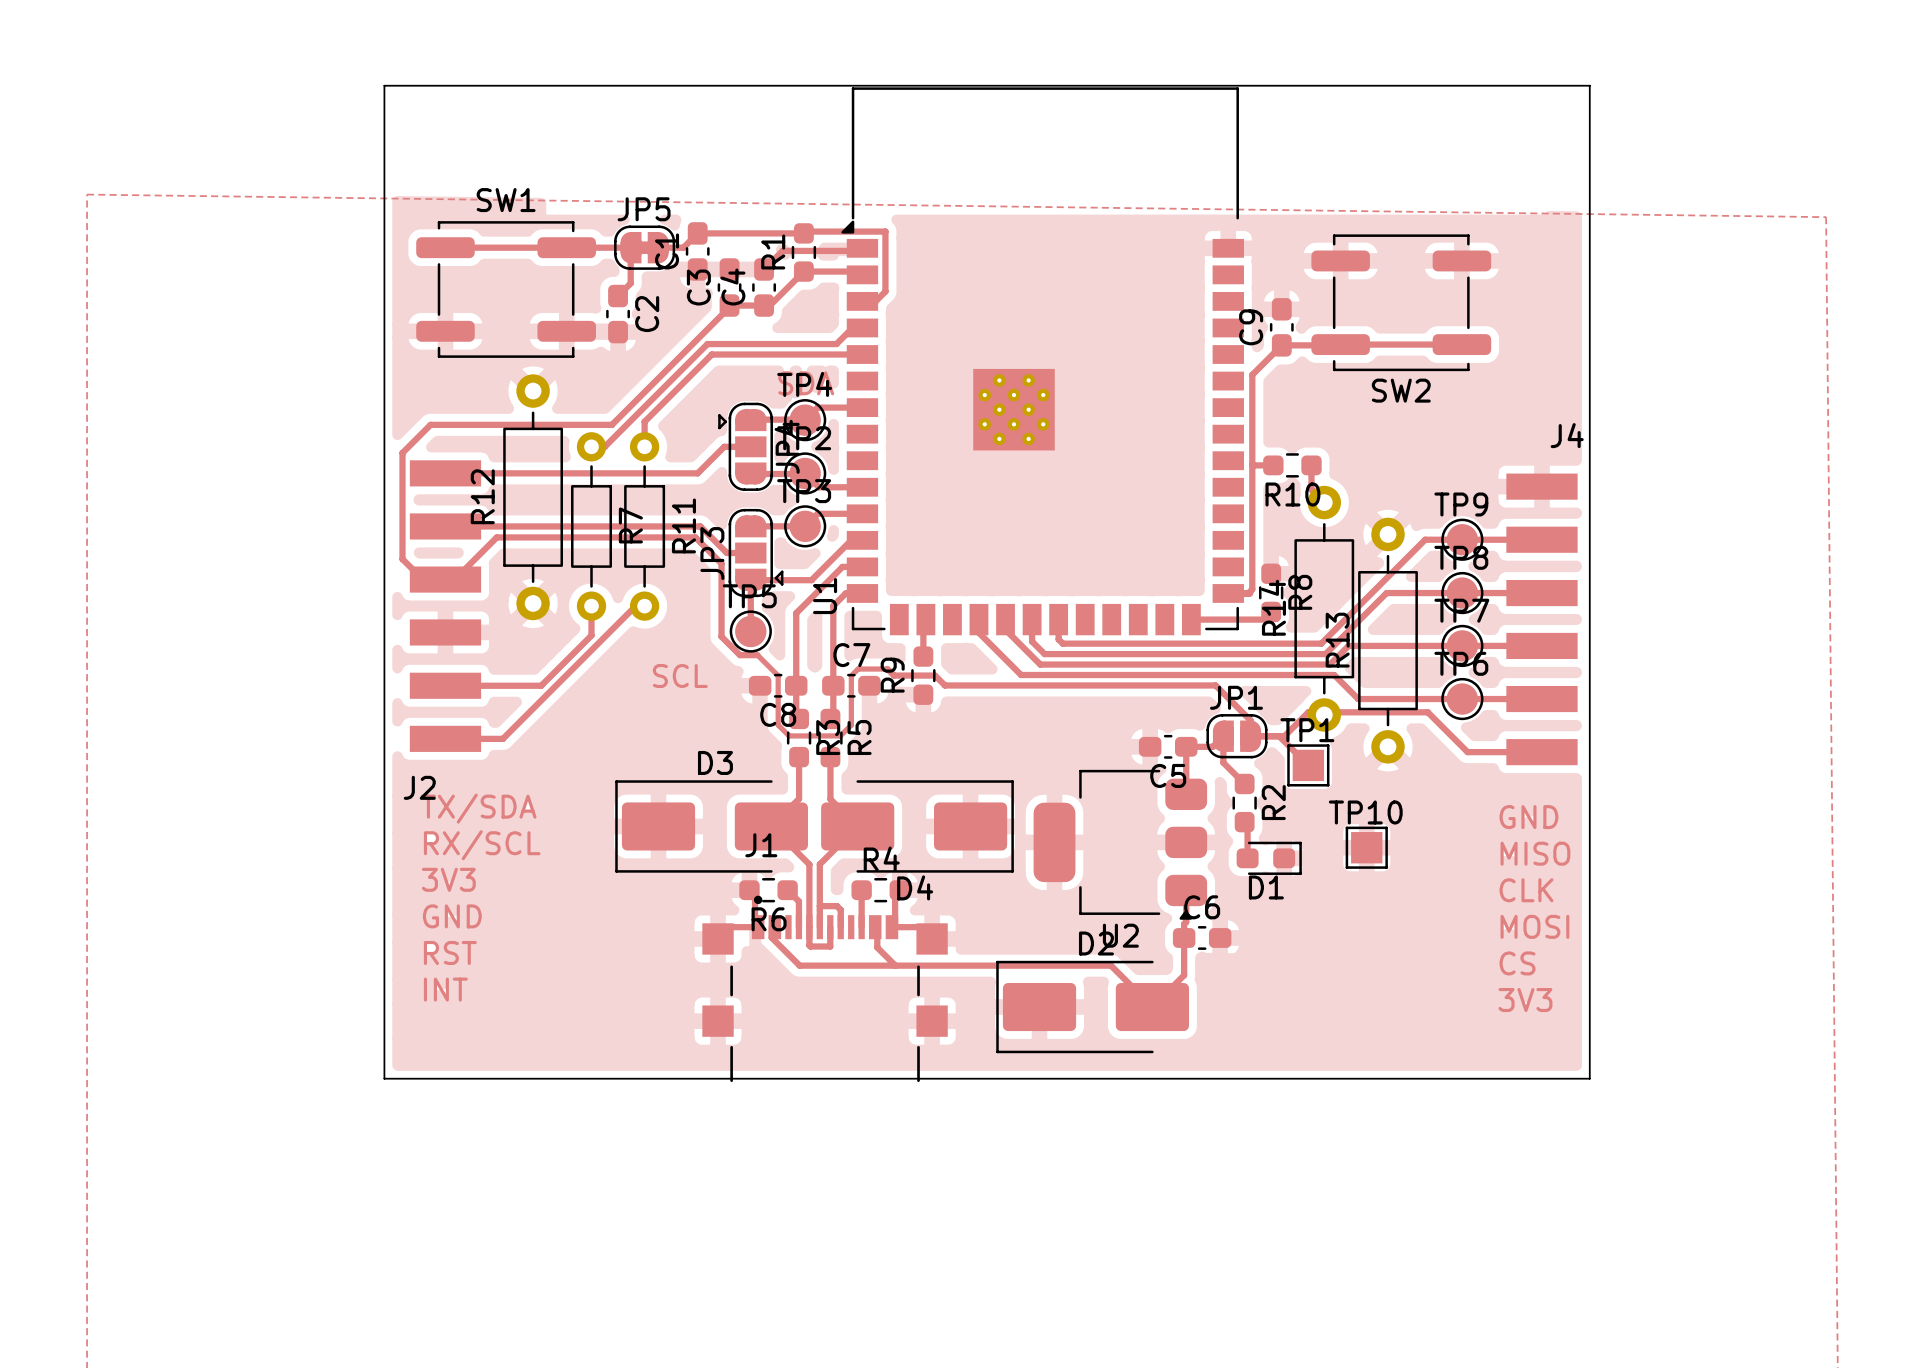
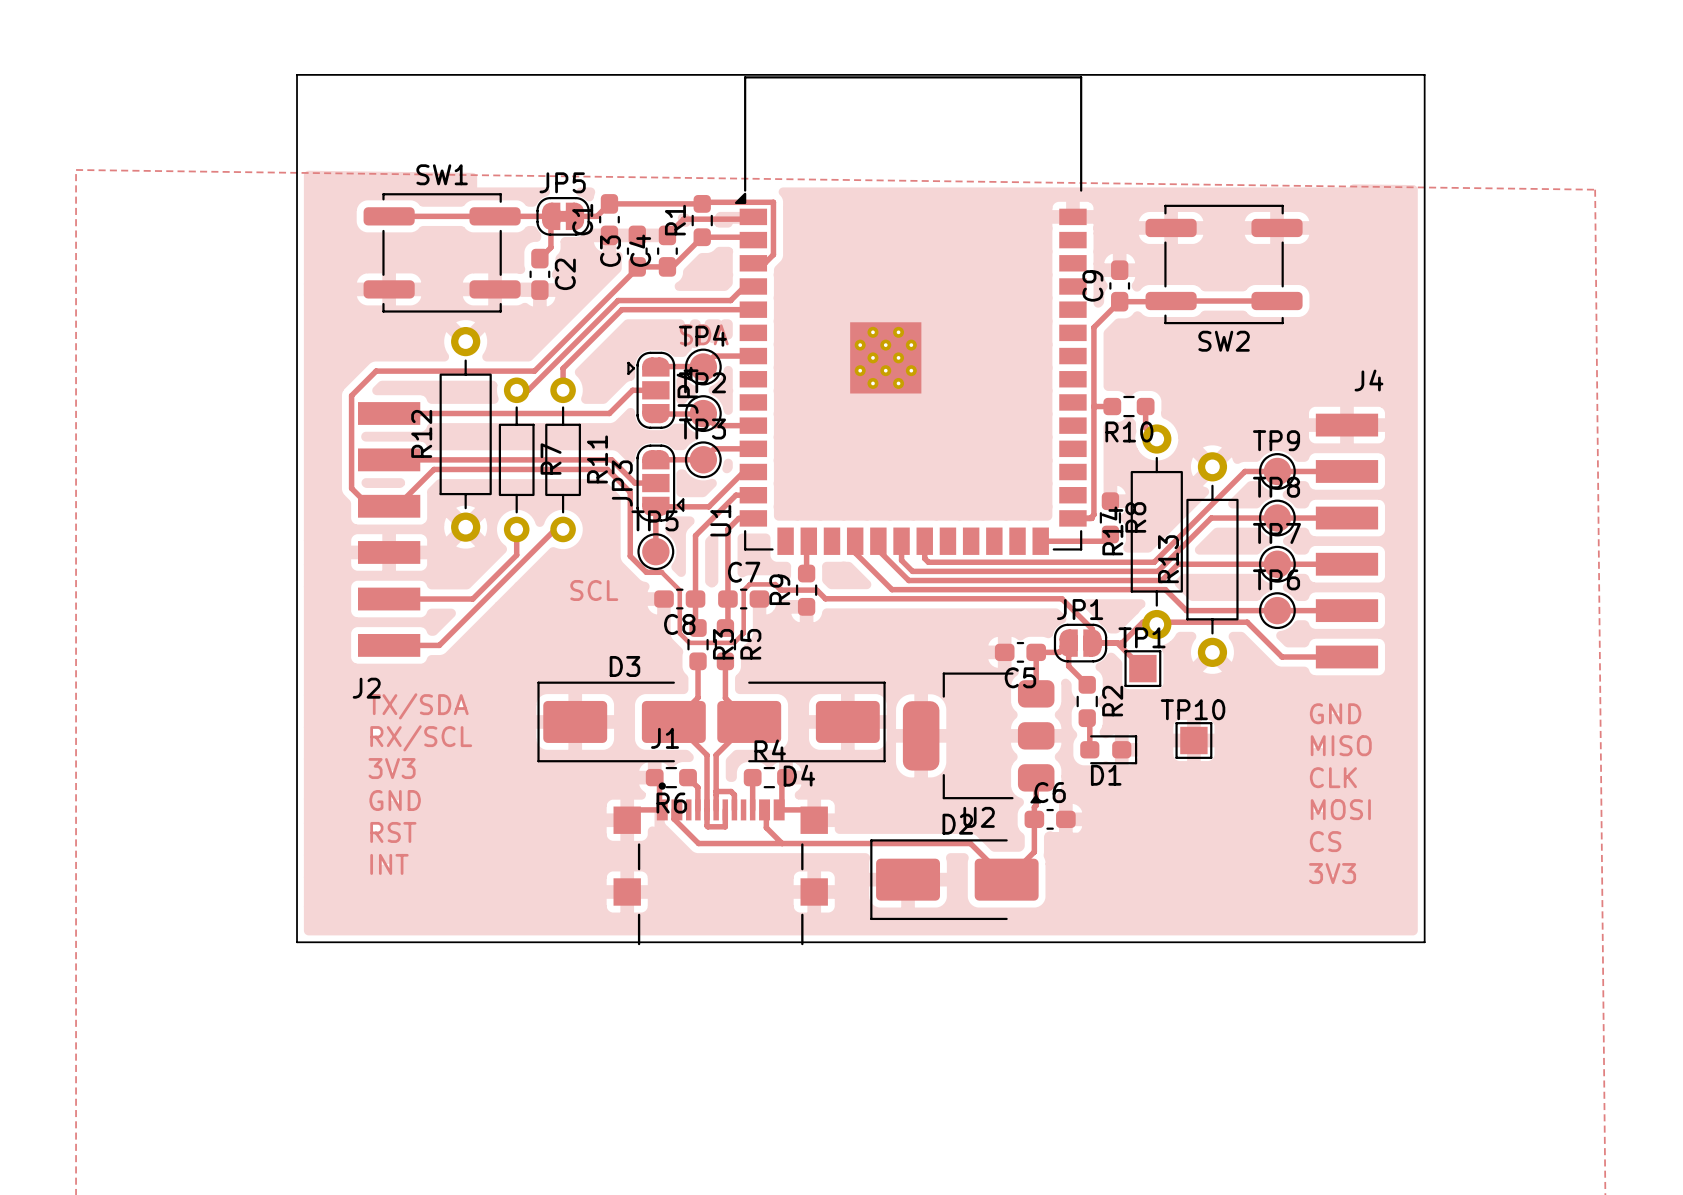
board edge: (384, 85) (384, 1078) -> (335, 74) (297, 74) (297, 942) (335, 942)
board edge: (1589, 85) (1589, 1078) -> (1388, 74) (1424, 74) (1424, 942) (1388, 942)

